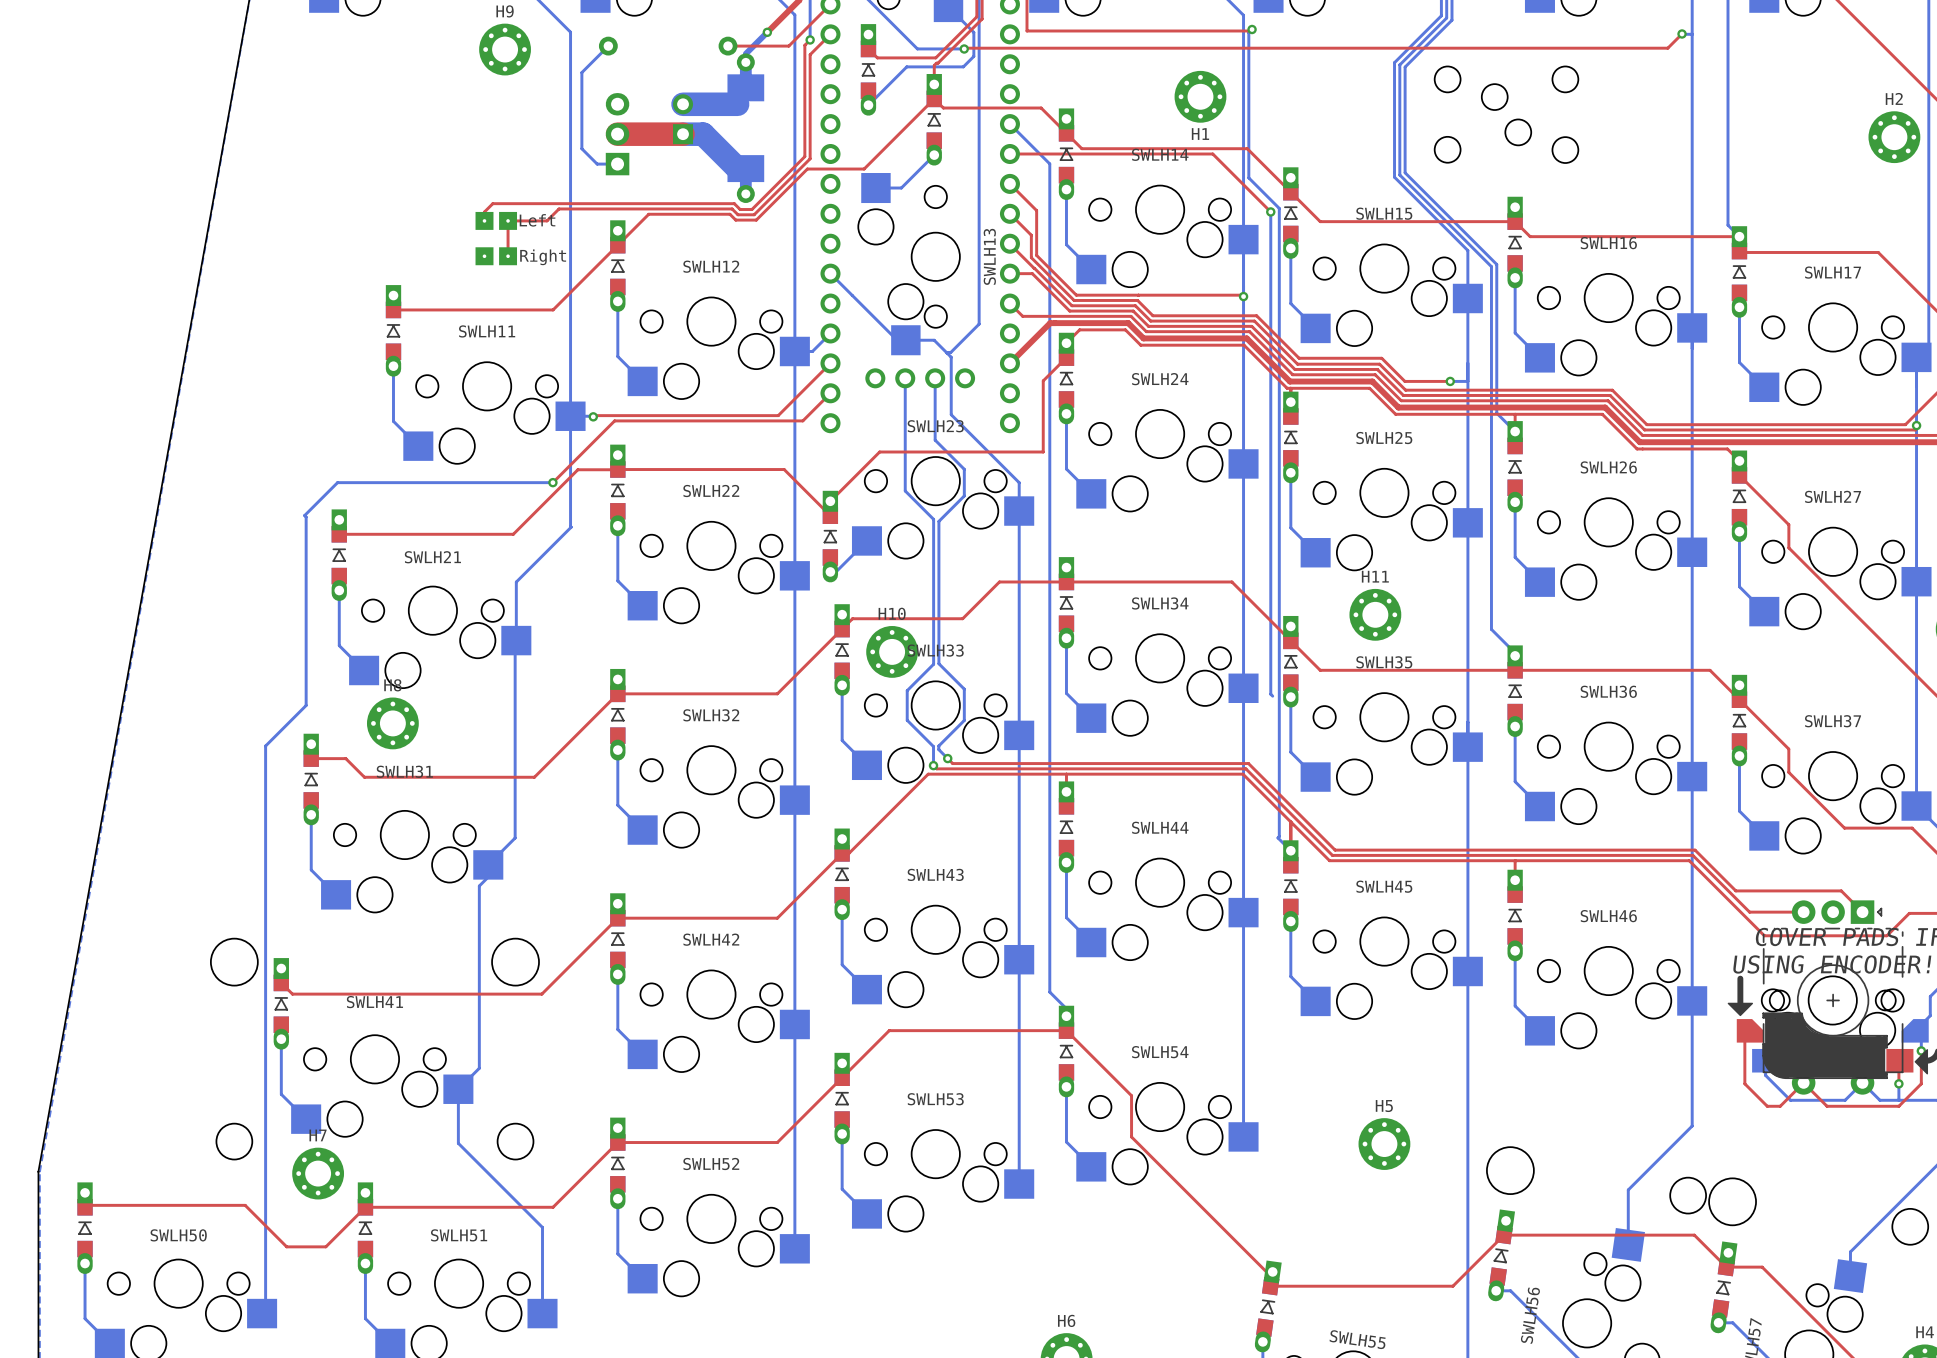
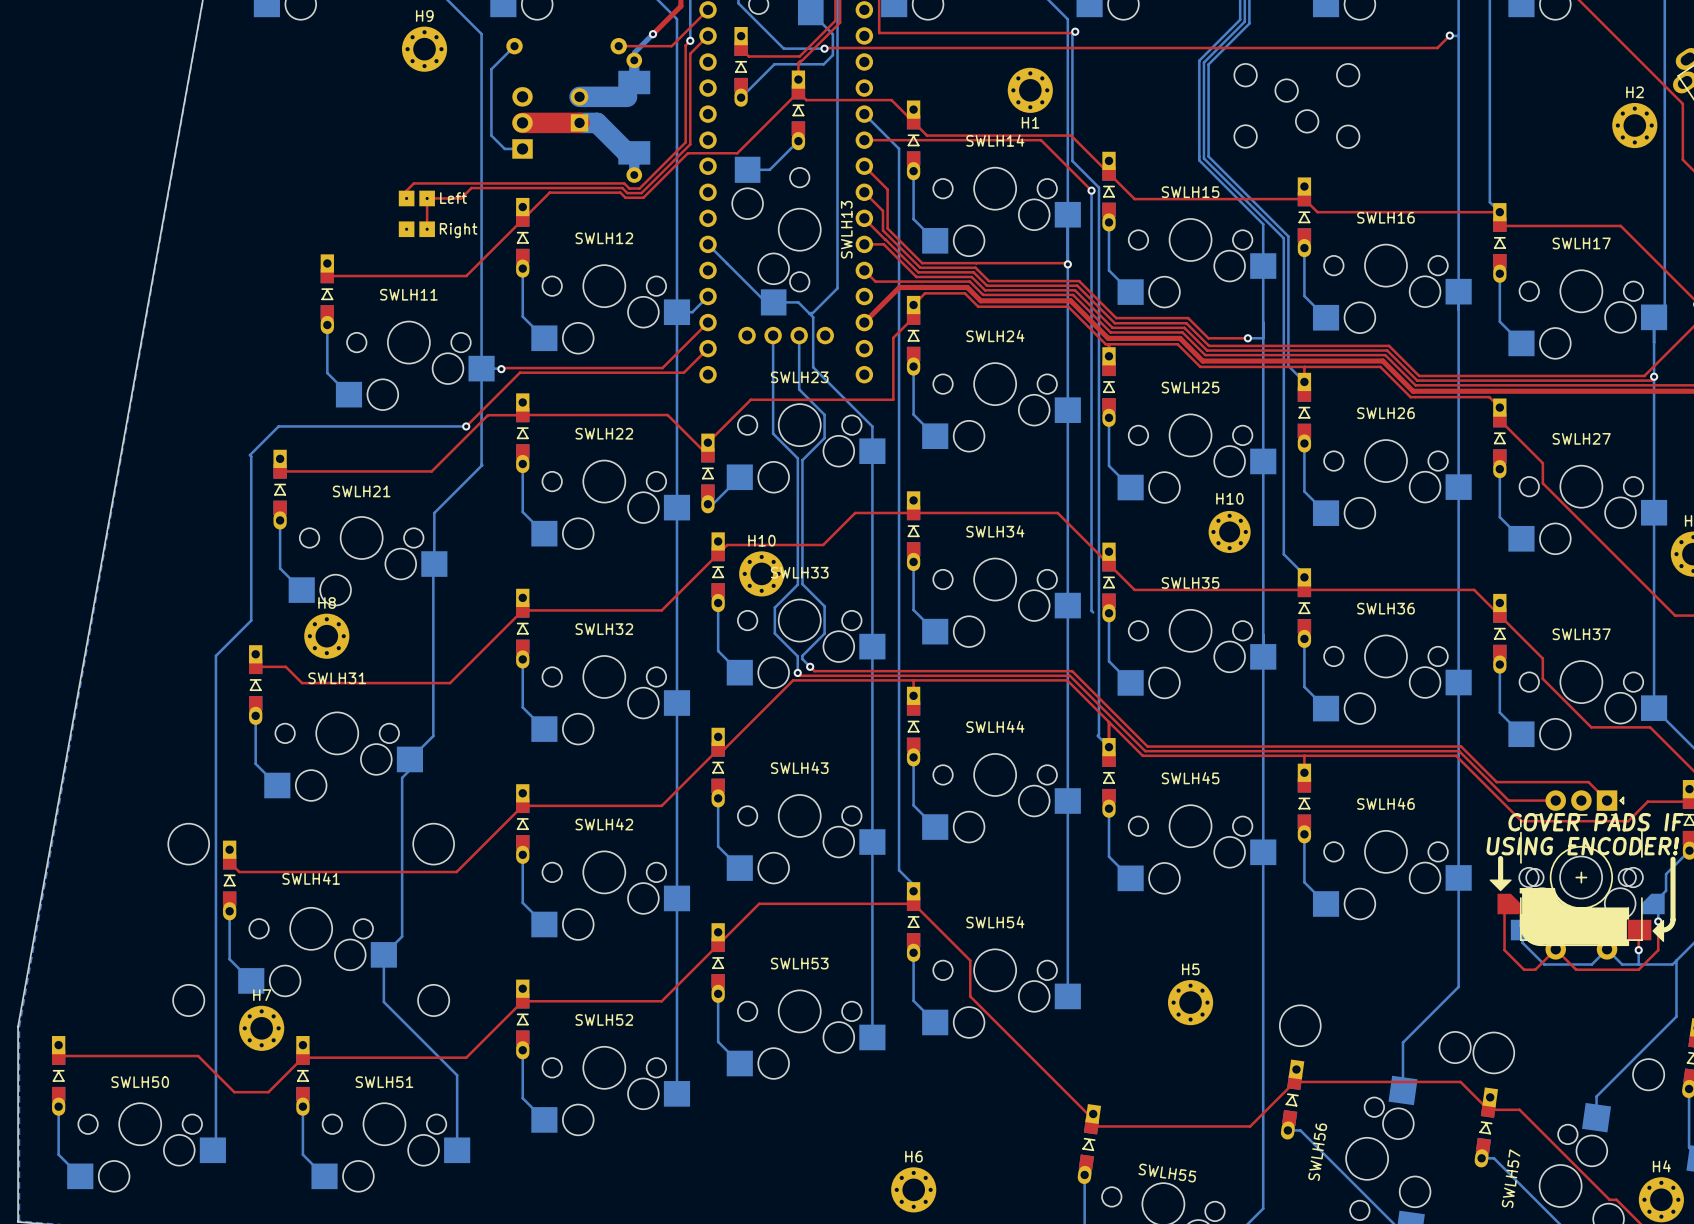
H10: none -> (1229, 531)
H11: (1375, 614) -> none

